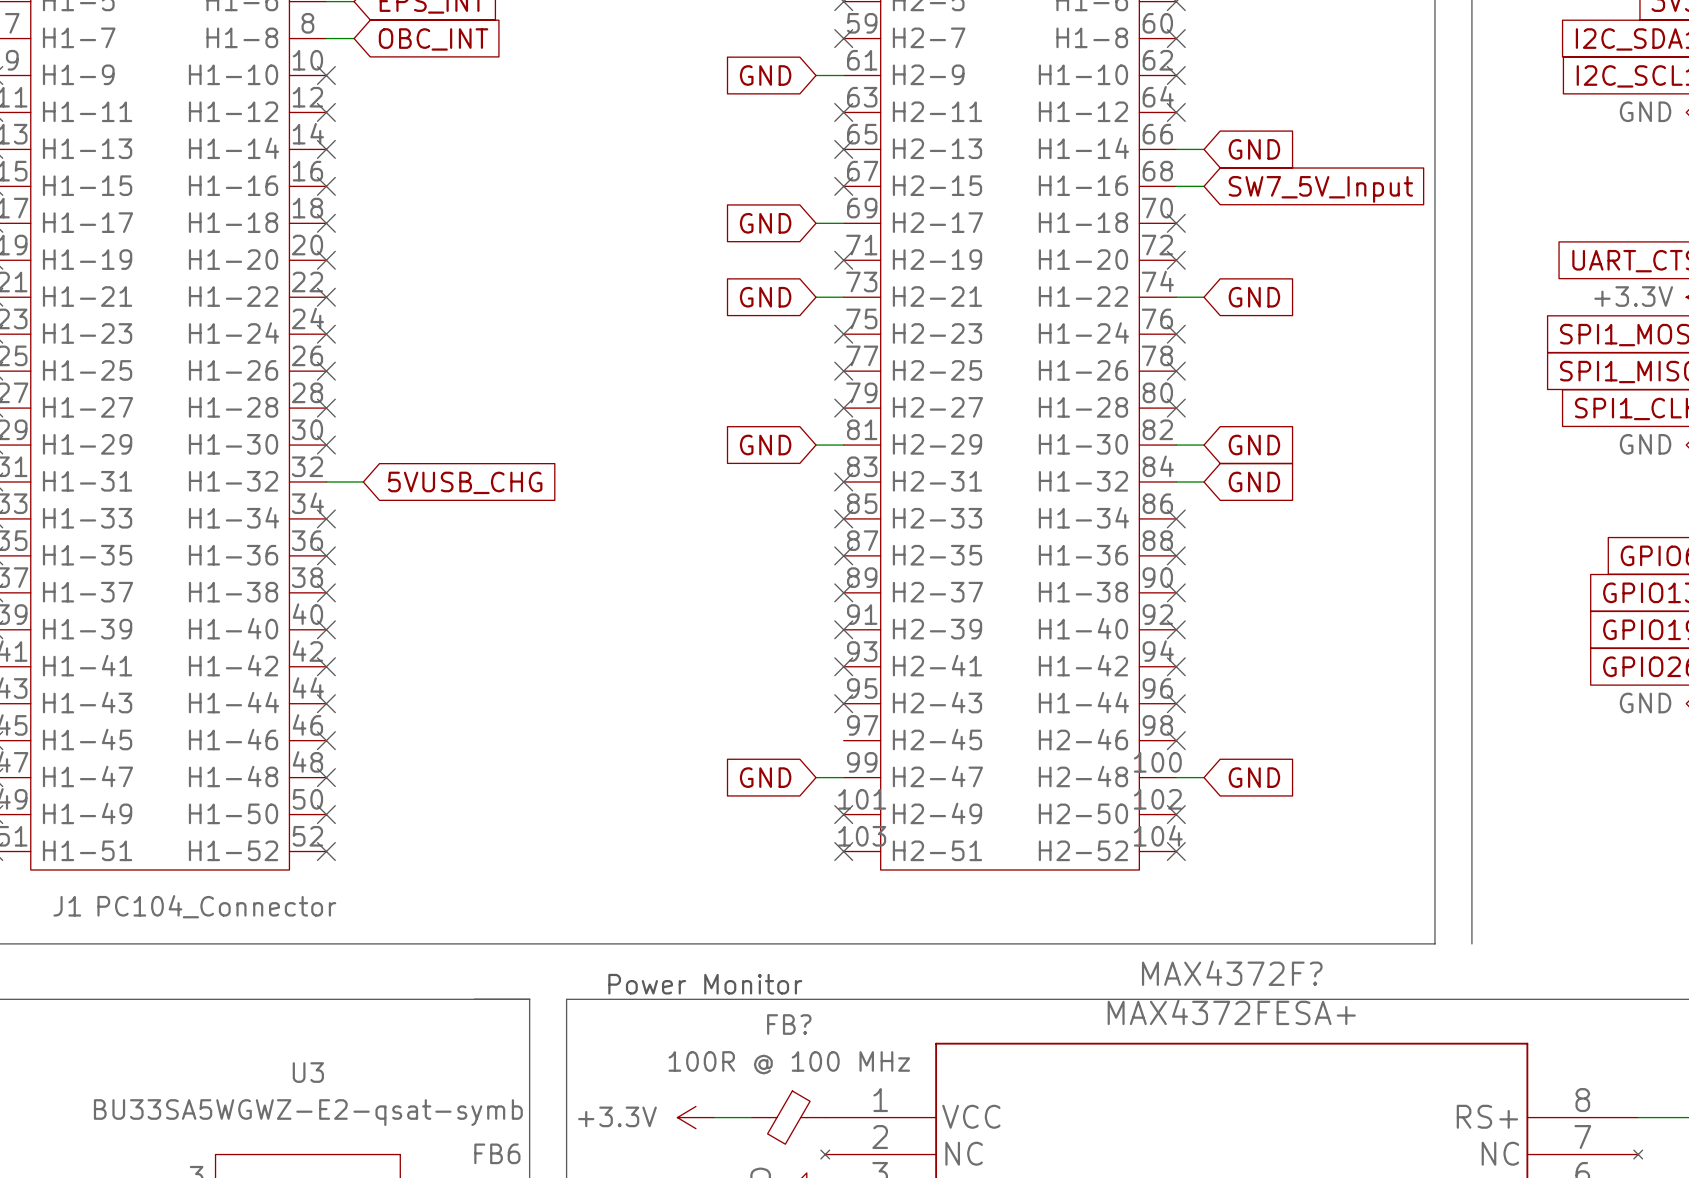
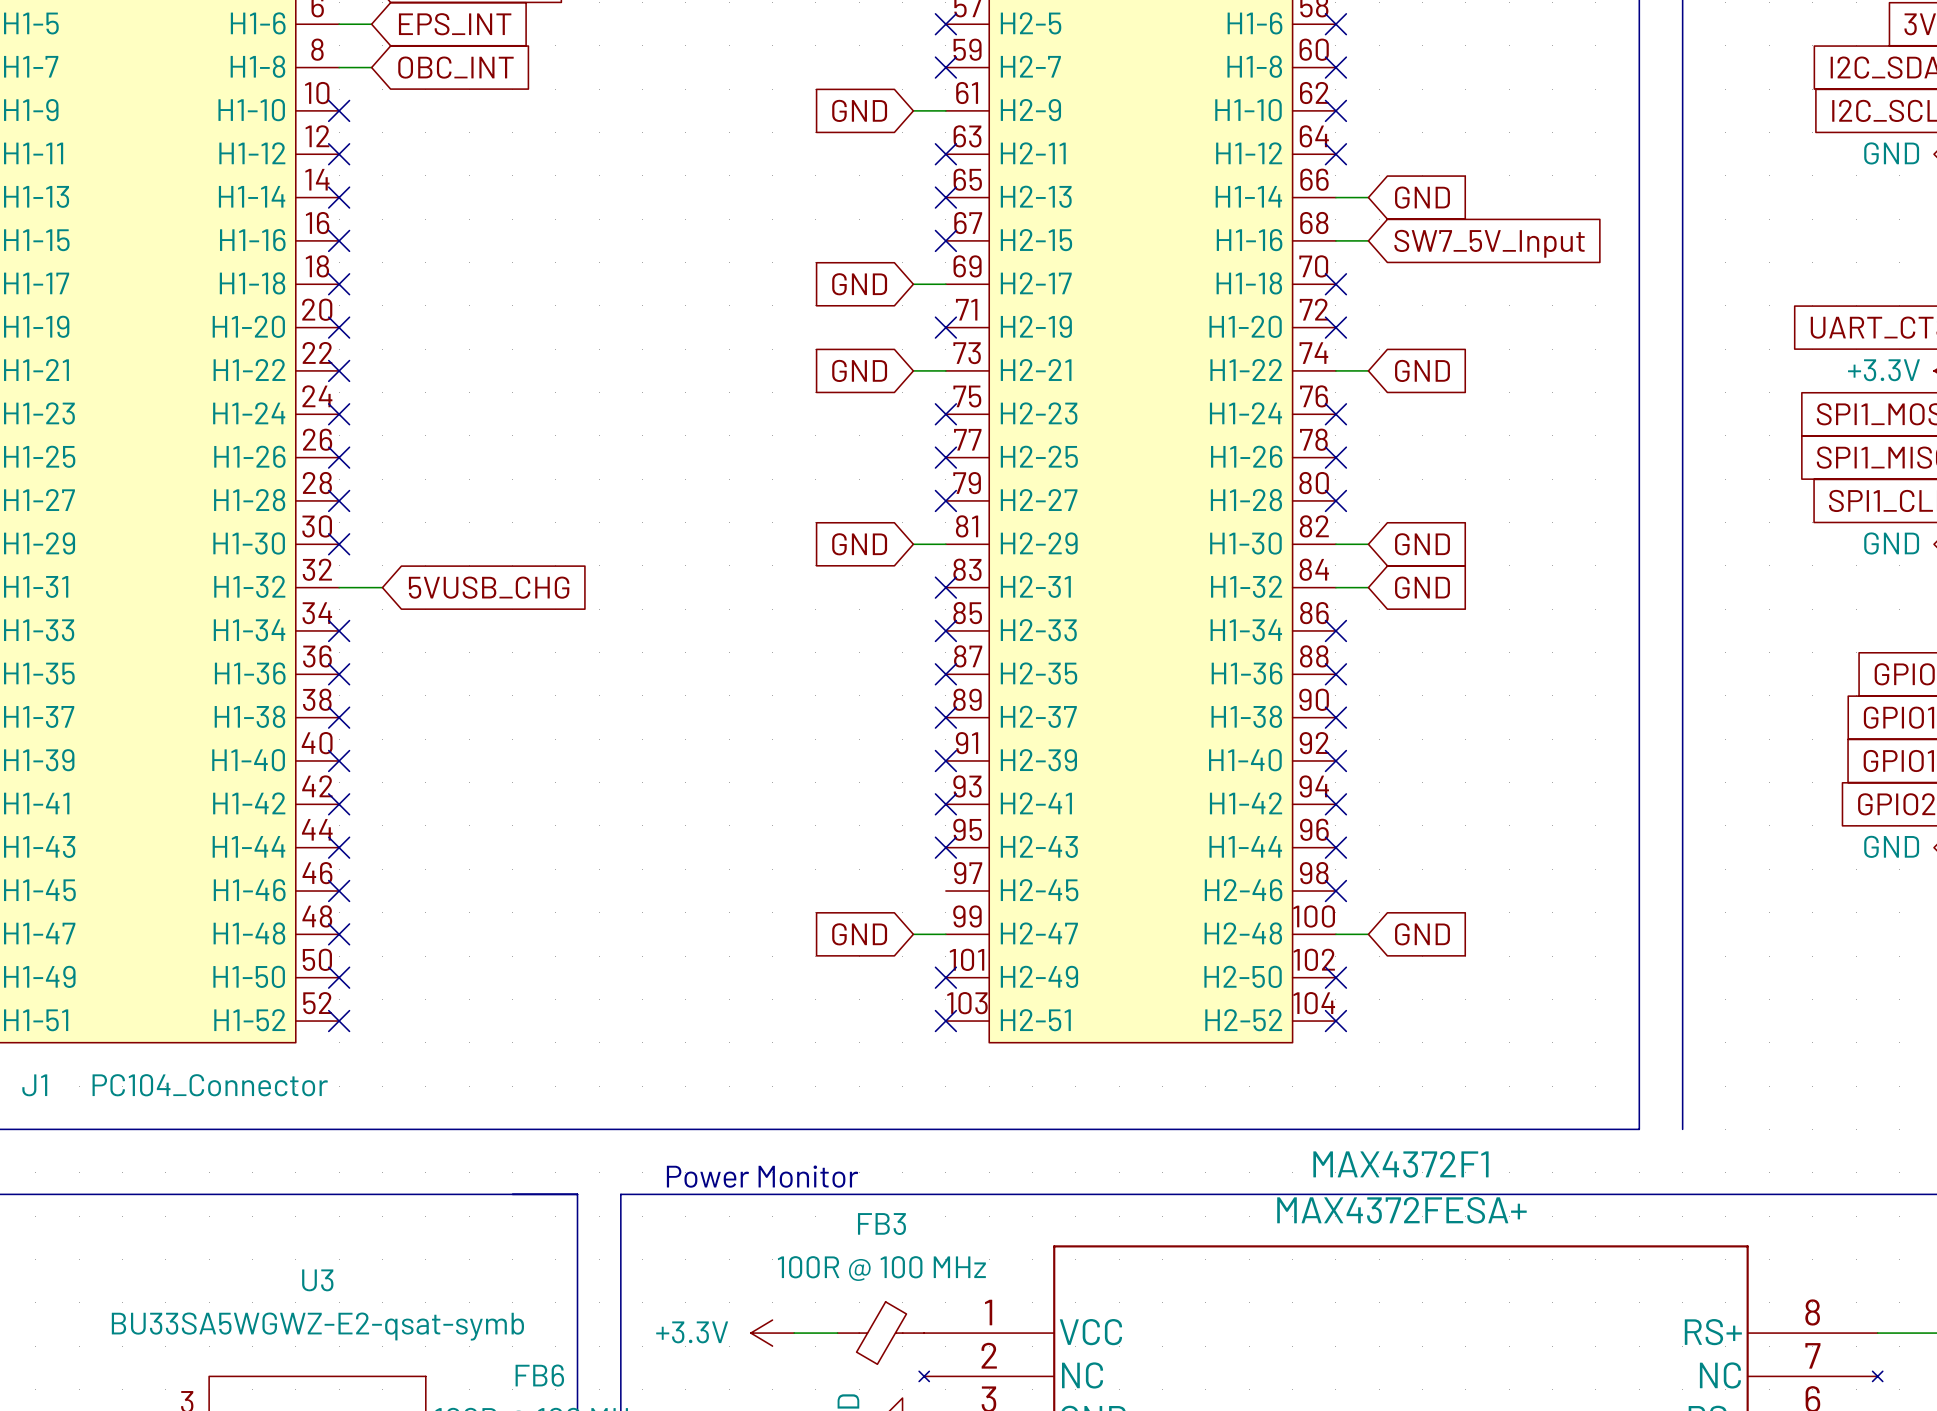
MAX4372F? name: MAX4372F? (1232, 973) -> MAX4372F1 (1400, 1164)
FB? name: FB? (789, 1024) -> FB3 (881, 1224)

